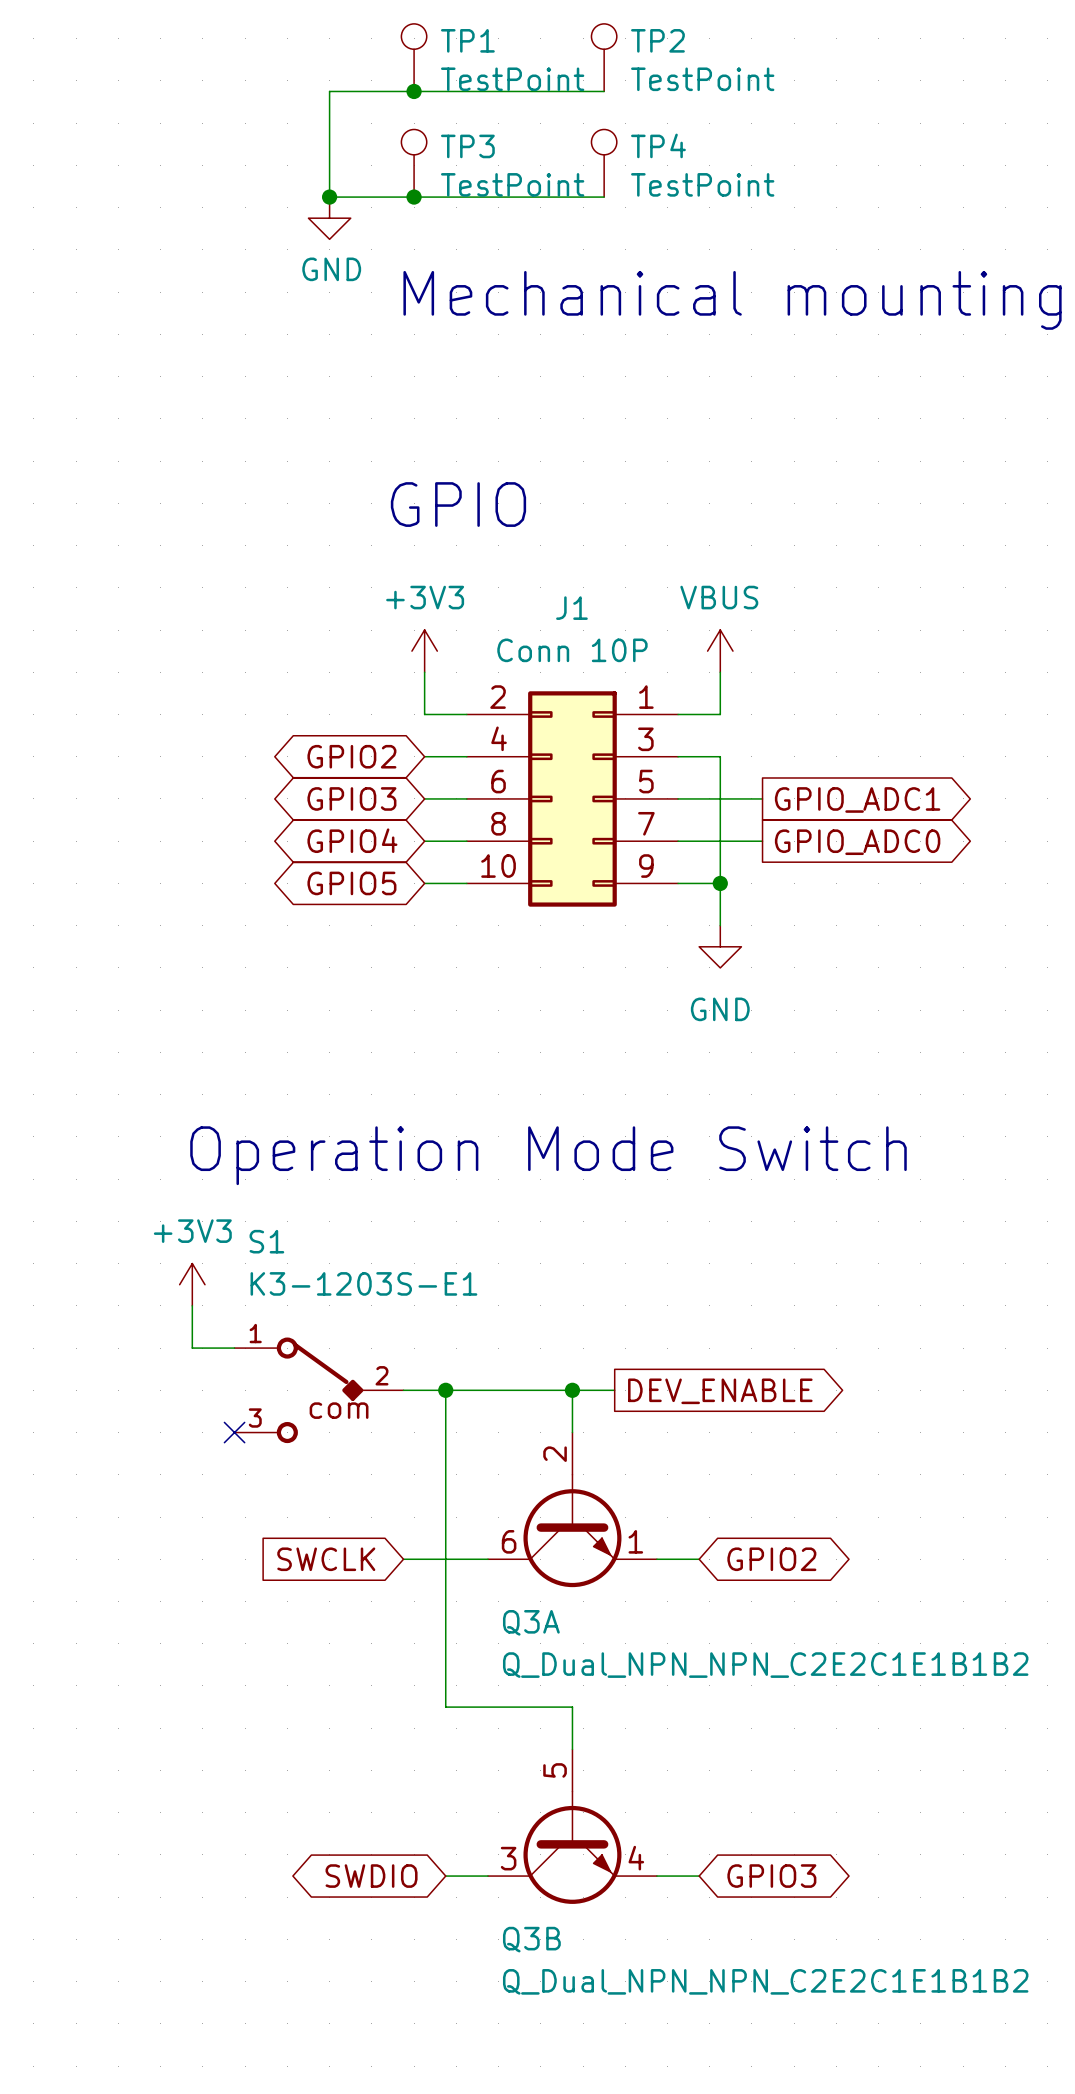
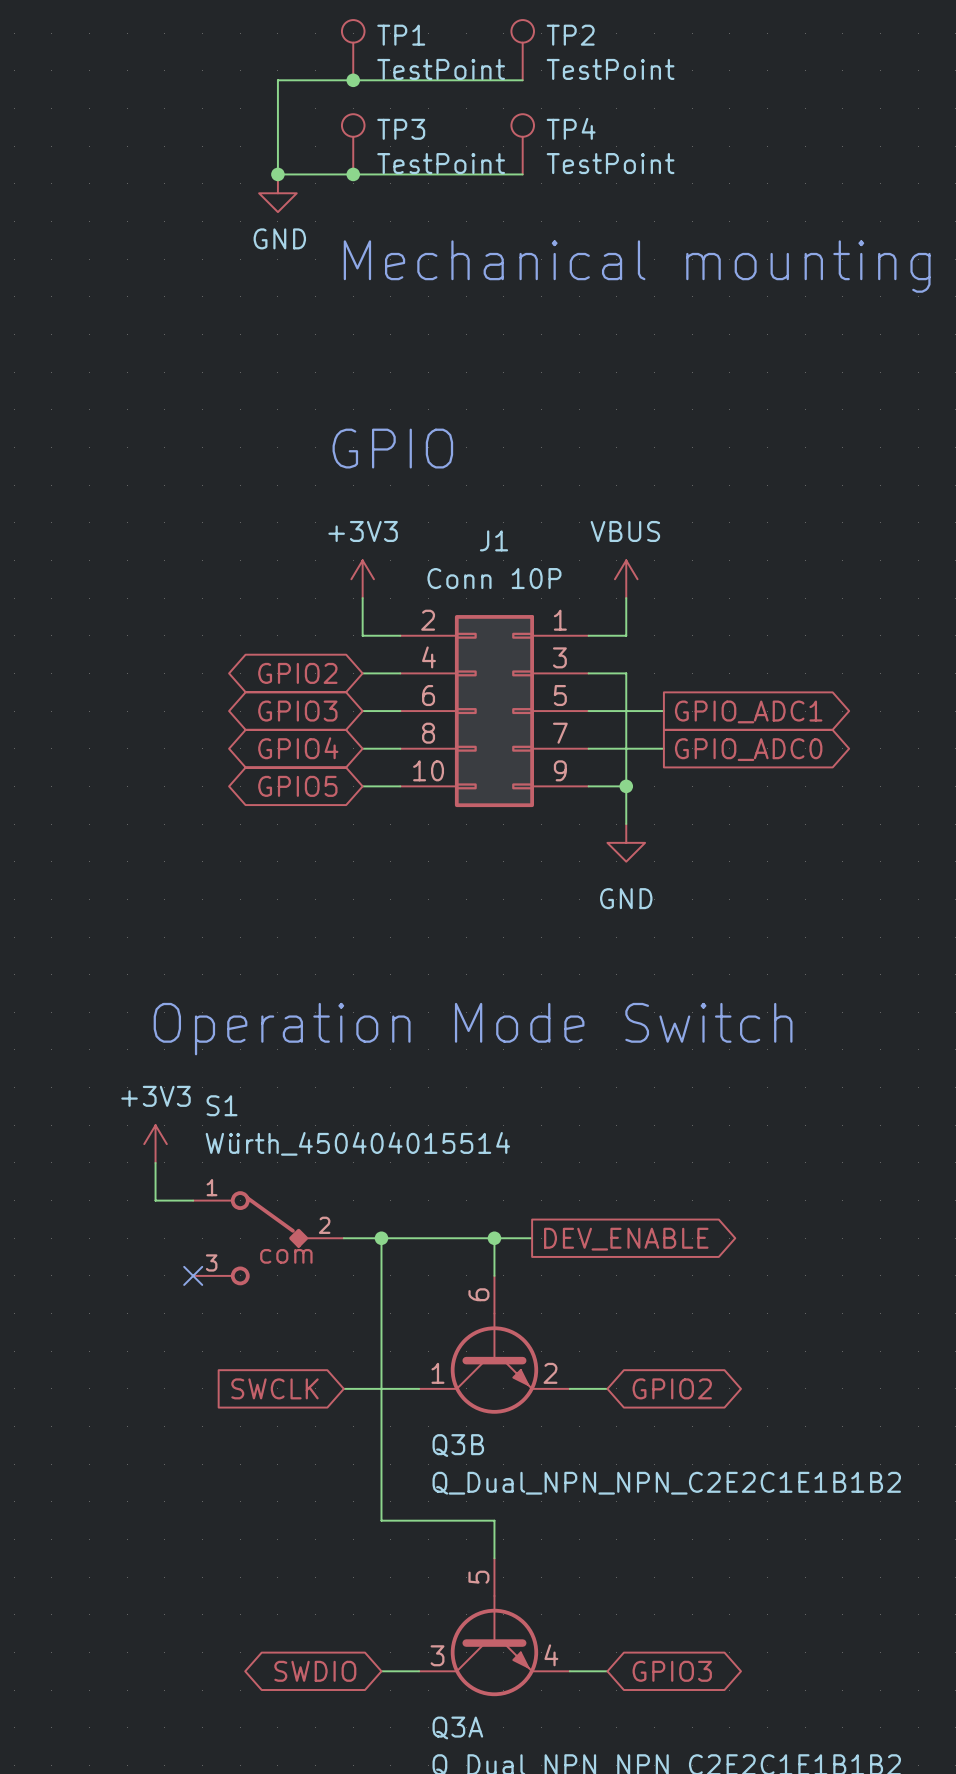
S1 value: K3-1203S-E1 (363, 1283) -> Würth_450404015514 (357, 1143)
Q3A pin number: 2 (555, 1454) -> 6 (478, 1294)
Q3A pin number: 6 (509, 1541) -> 1 (437, 1373)
Q3A pin number: 1 (635, 1541) -> 2 (550, 1373)
Q3A name: Q3A (531, 1622) -> Q3B (458, 1445)
Q3B name: Q3B (531, 1939) -> Q3A (457, 1727)

